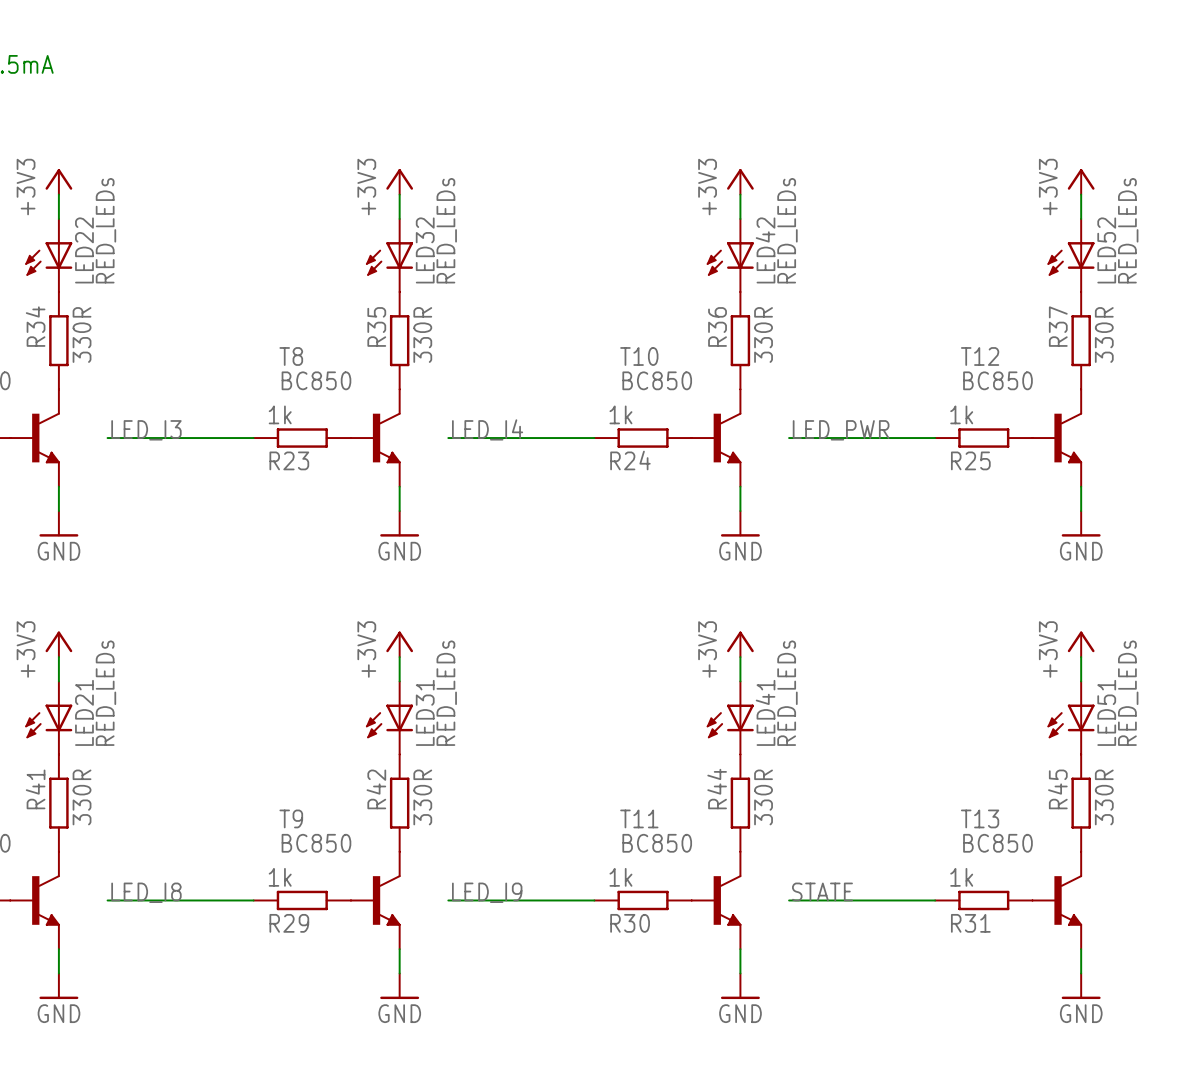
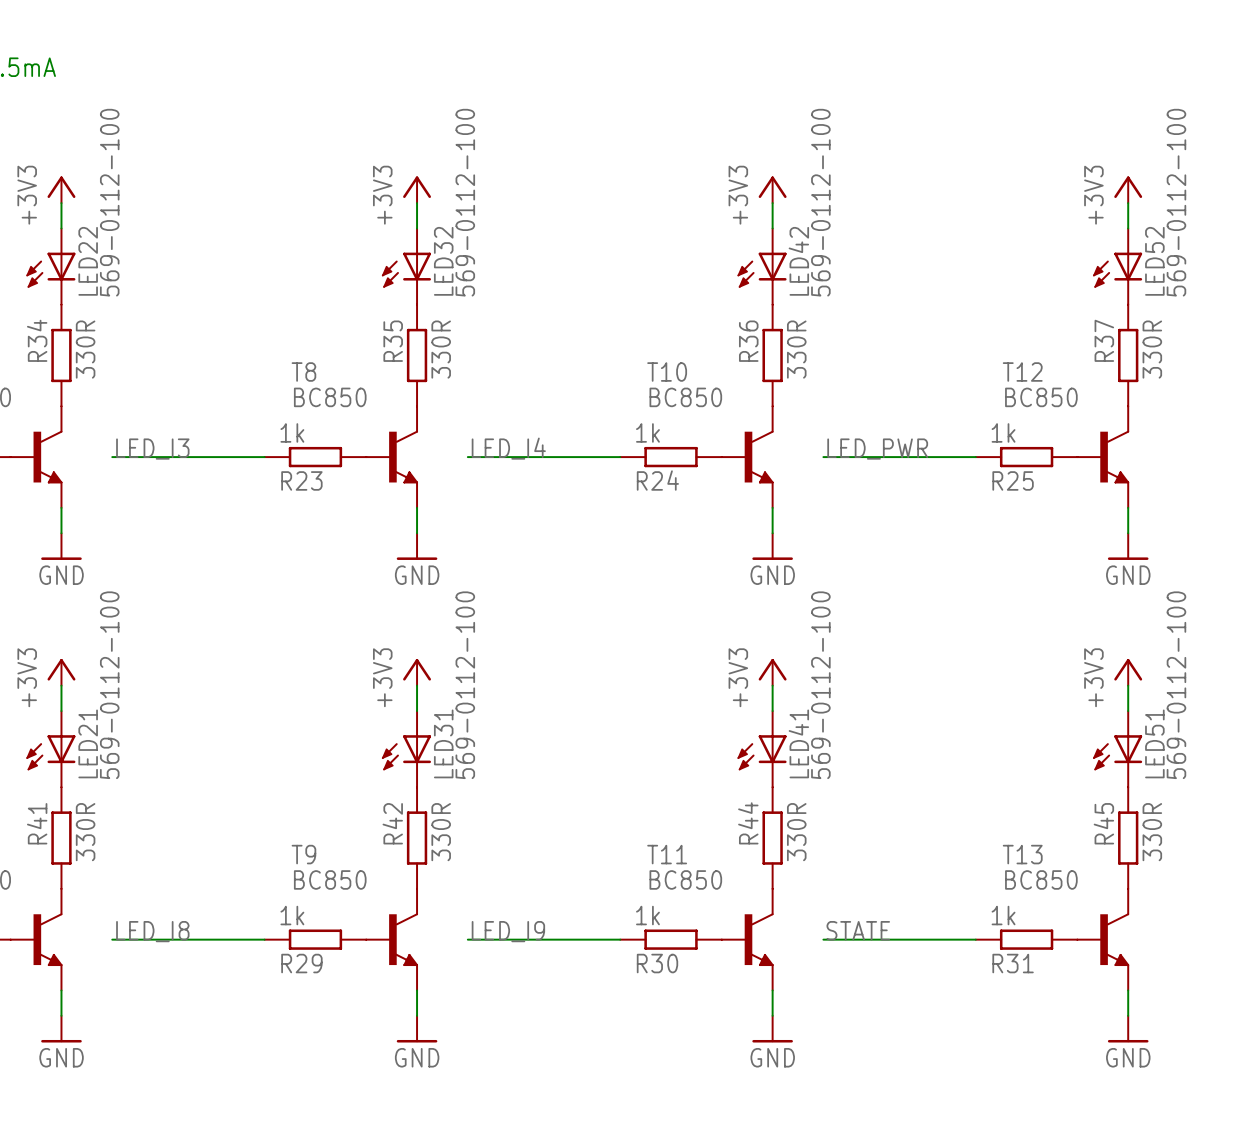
LED22 value: RED_LEDs (105, 230) -> 569-0112-100 (109, 202)
LED32 value: RED_LEDs (446, 230) -> 569-0112-100 (465, 202)
LED42 value: RED_LEDs (787, 230) -> 569-0112-100 (820, 202)
LED52 value: RED_LEDs (1128, 230) -> 569-0112-100 (1176, 202)
LED21 value: RED_LEDs (105, 693) -> 569-0112-100 (109, 685)
LED31 value: RED_LEDs (446, 693) -> 569-0112-100 (465, 685)
LED41 value: RED_LEDs (787, 693) -> 569-0112-100 (820, 685)
LED51 value: RED_LEDs (1128, 693) -> 569-0112-100 (1176, 685)

